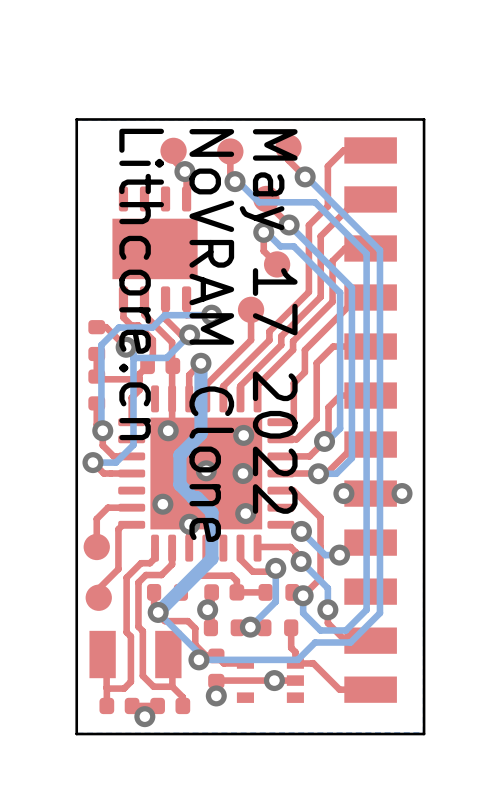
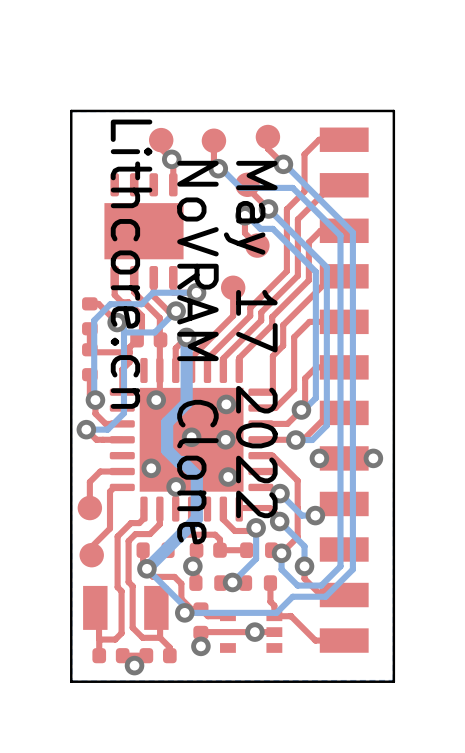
text position: May 17 2022 (268, 321) -> May 17 2022 (250, 339)
text position: NoVRAM Clone (211, 335) -> NoVRAM Clone (197, 352)

